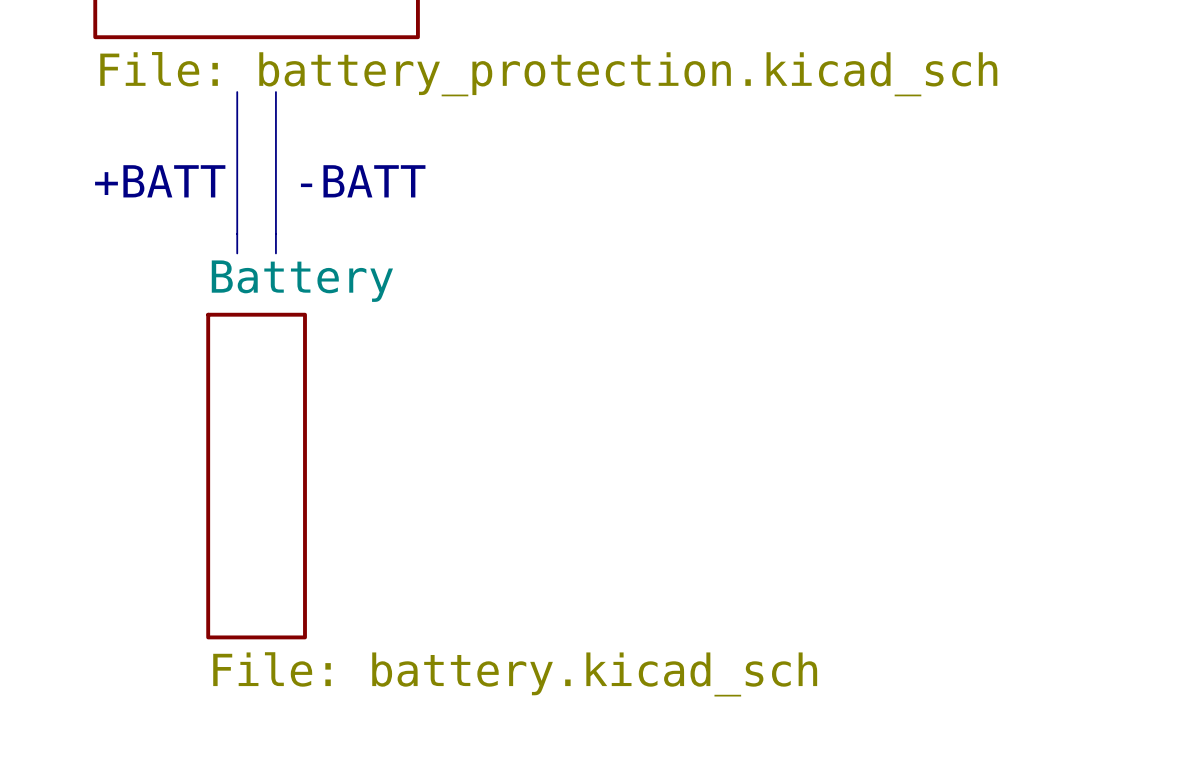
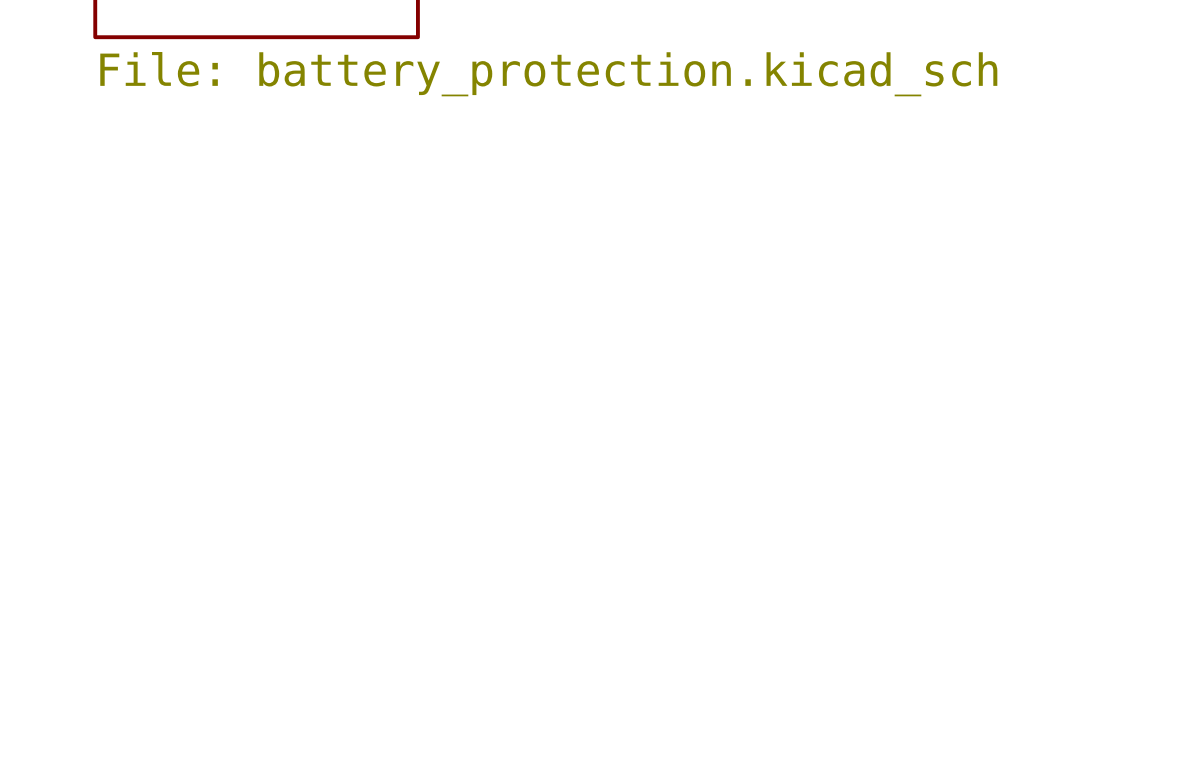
line: (237, 92) (237, 253) -> none
line: (275, 92) (275, 253) -> none
text: +BATT (160, 181) -> none
text: -BATT (363, 181) -> none
sheet Battery: File: battery.kicad_sch (256, 476) -> none

